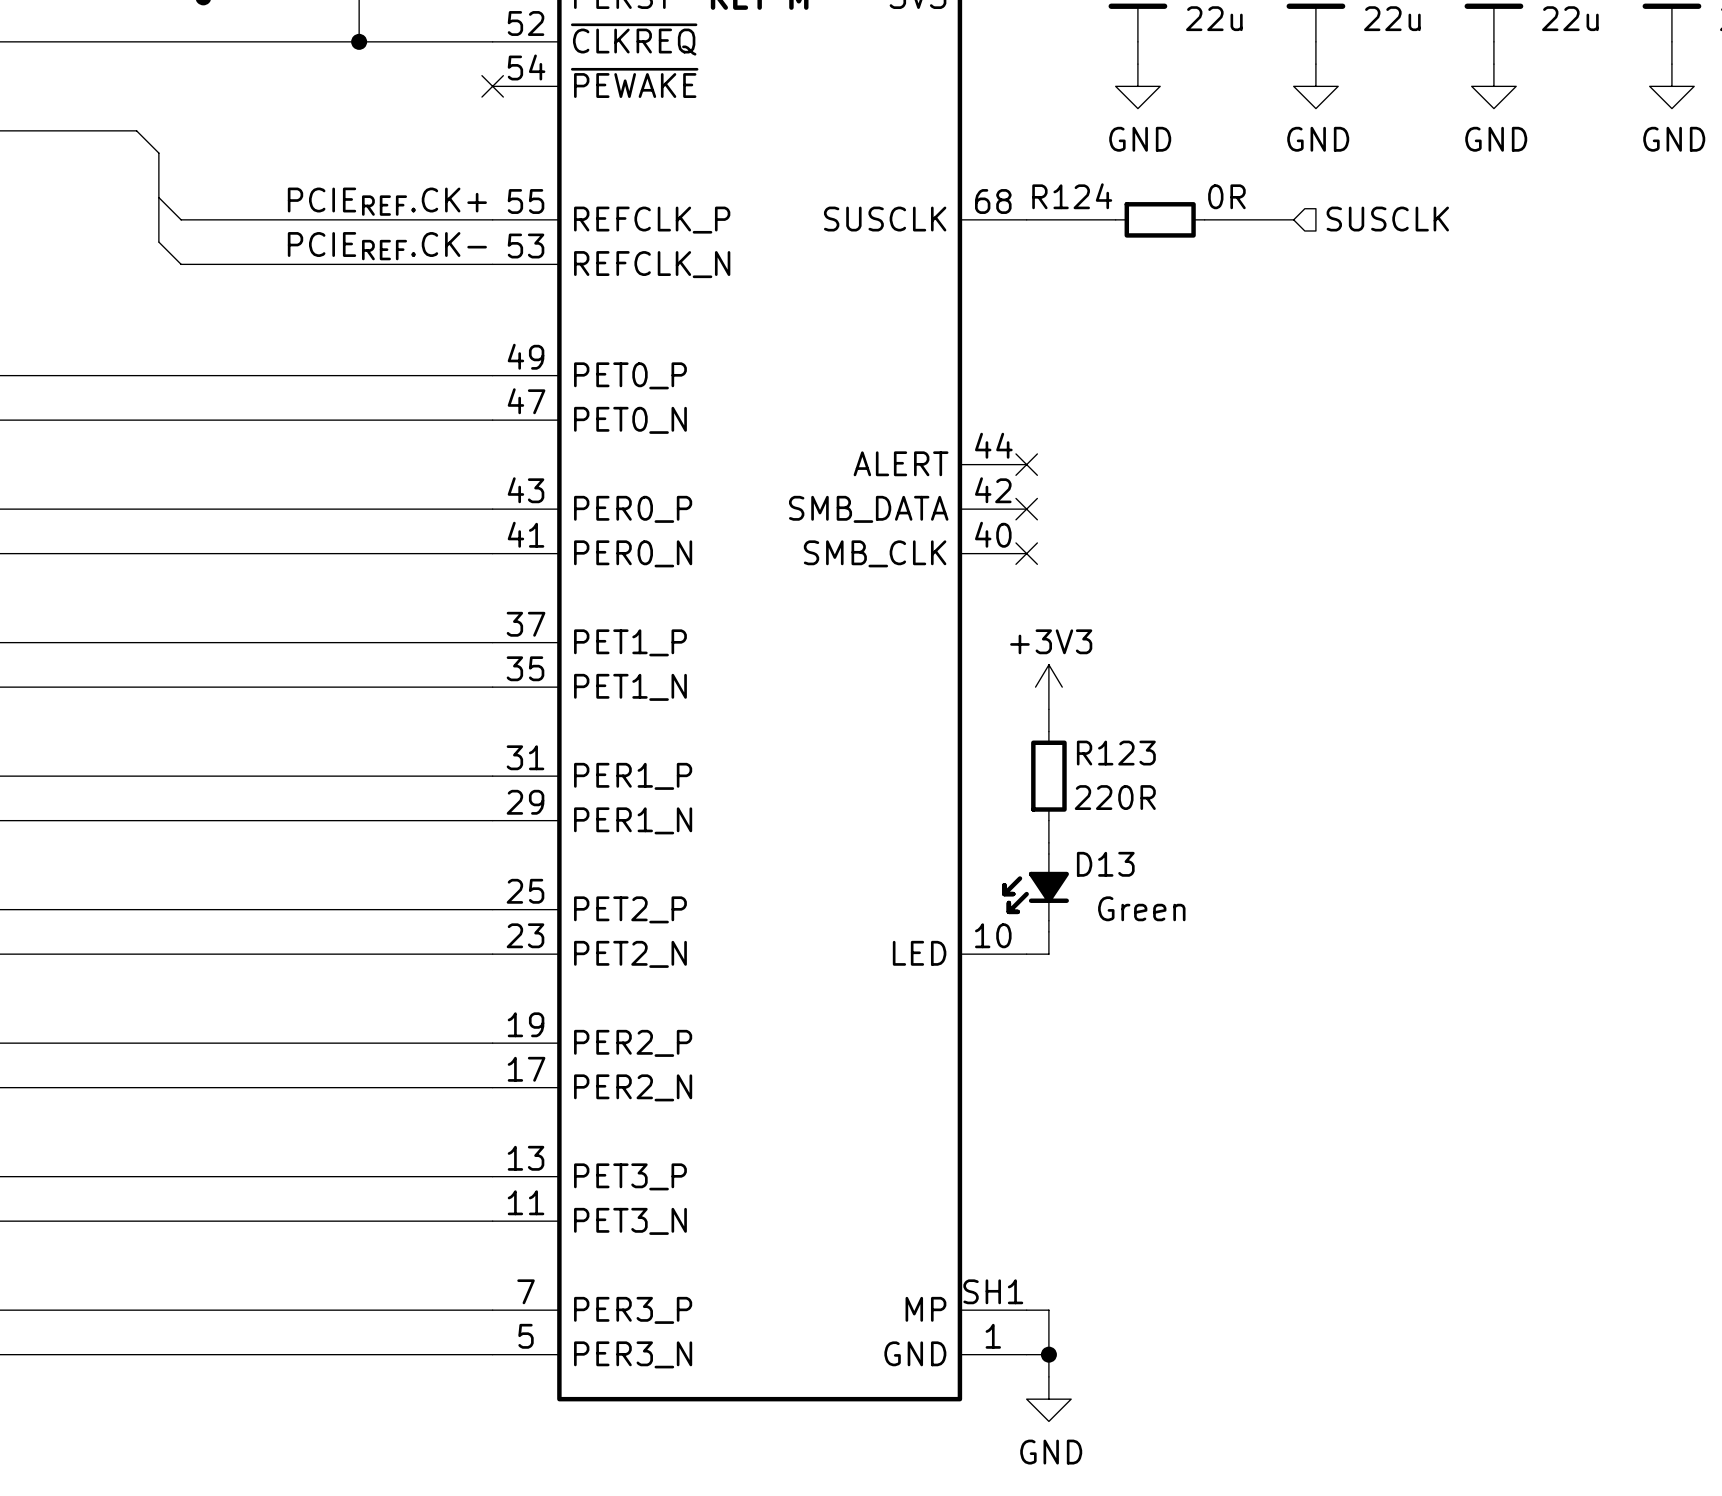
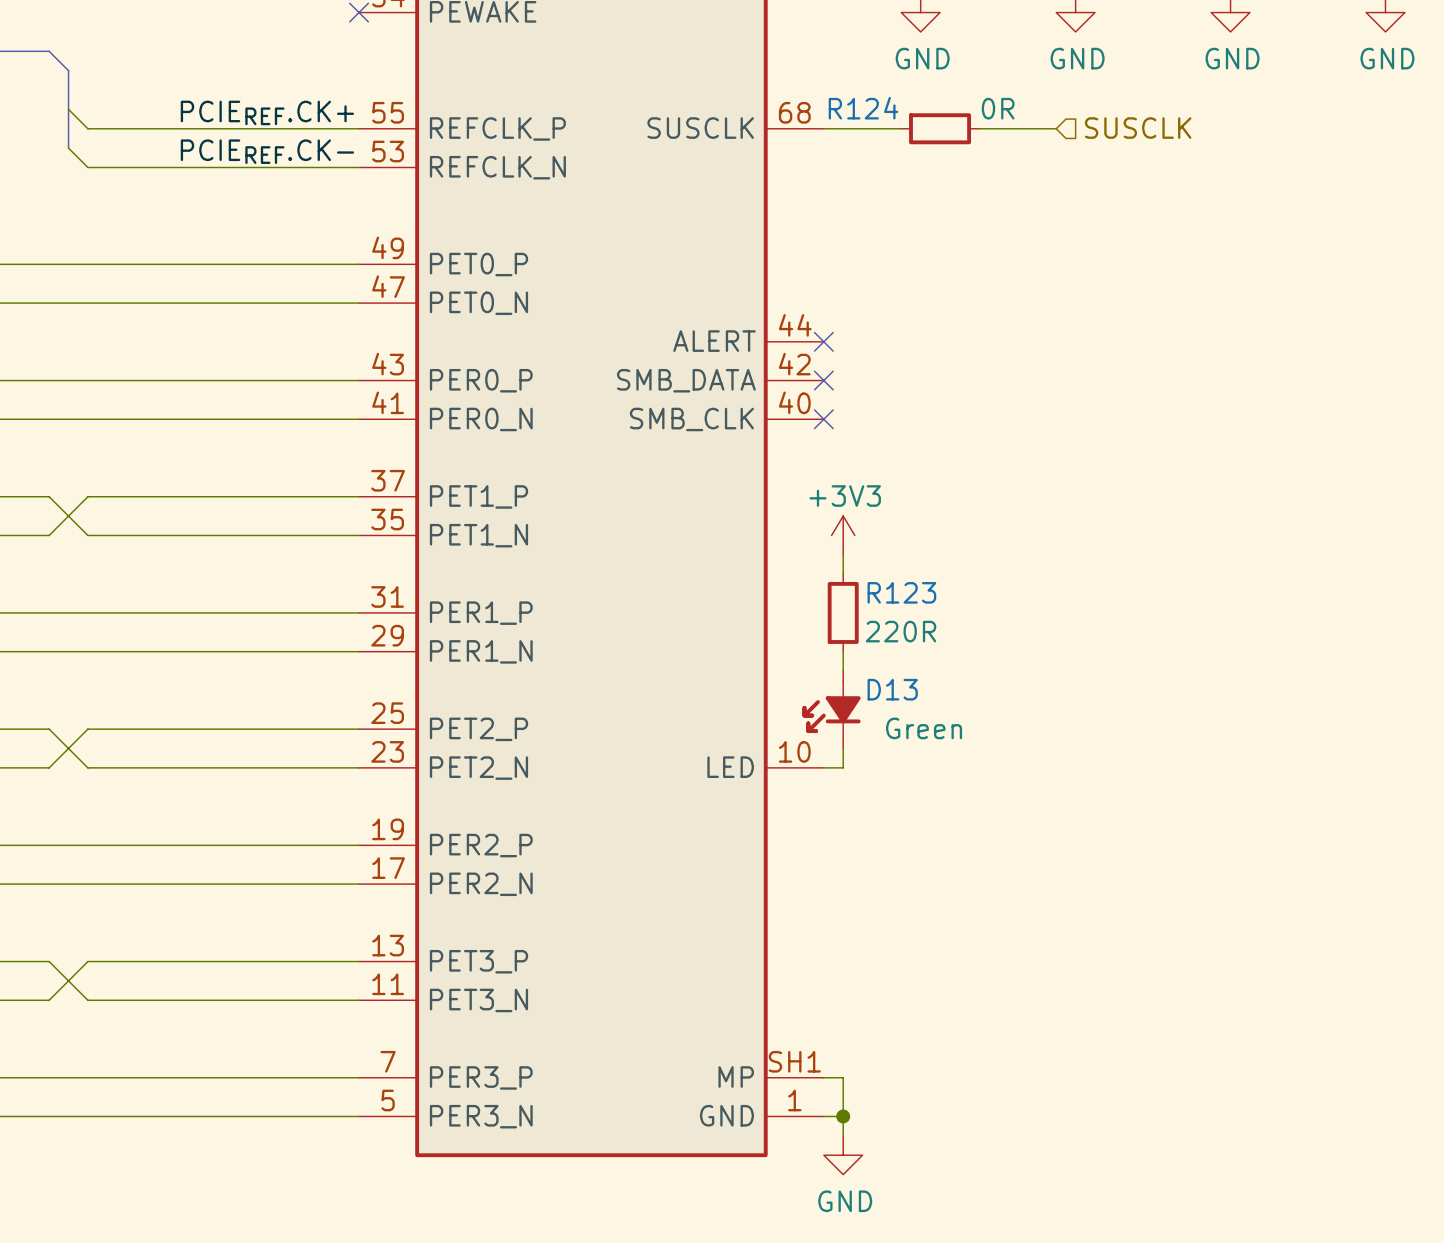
wire: (136, 642) (181, 642) -> (49, 496) (87, 535)
wire: (136, 687) (181, 687) -> (49, 535) (87, 496)
wire: (136, 909) (181, 909) -> (49, 729) (87, 767)
wire: (136, 954) (181, 954) -> (49, 767) (87, 729)
wire: (136, 1176) (181, 1176) -> (49, 961) (87, 1000)
wire: (136, 1221) (181, 1221) -> (49, 1000) (87, 961)

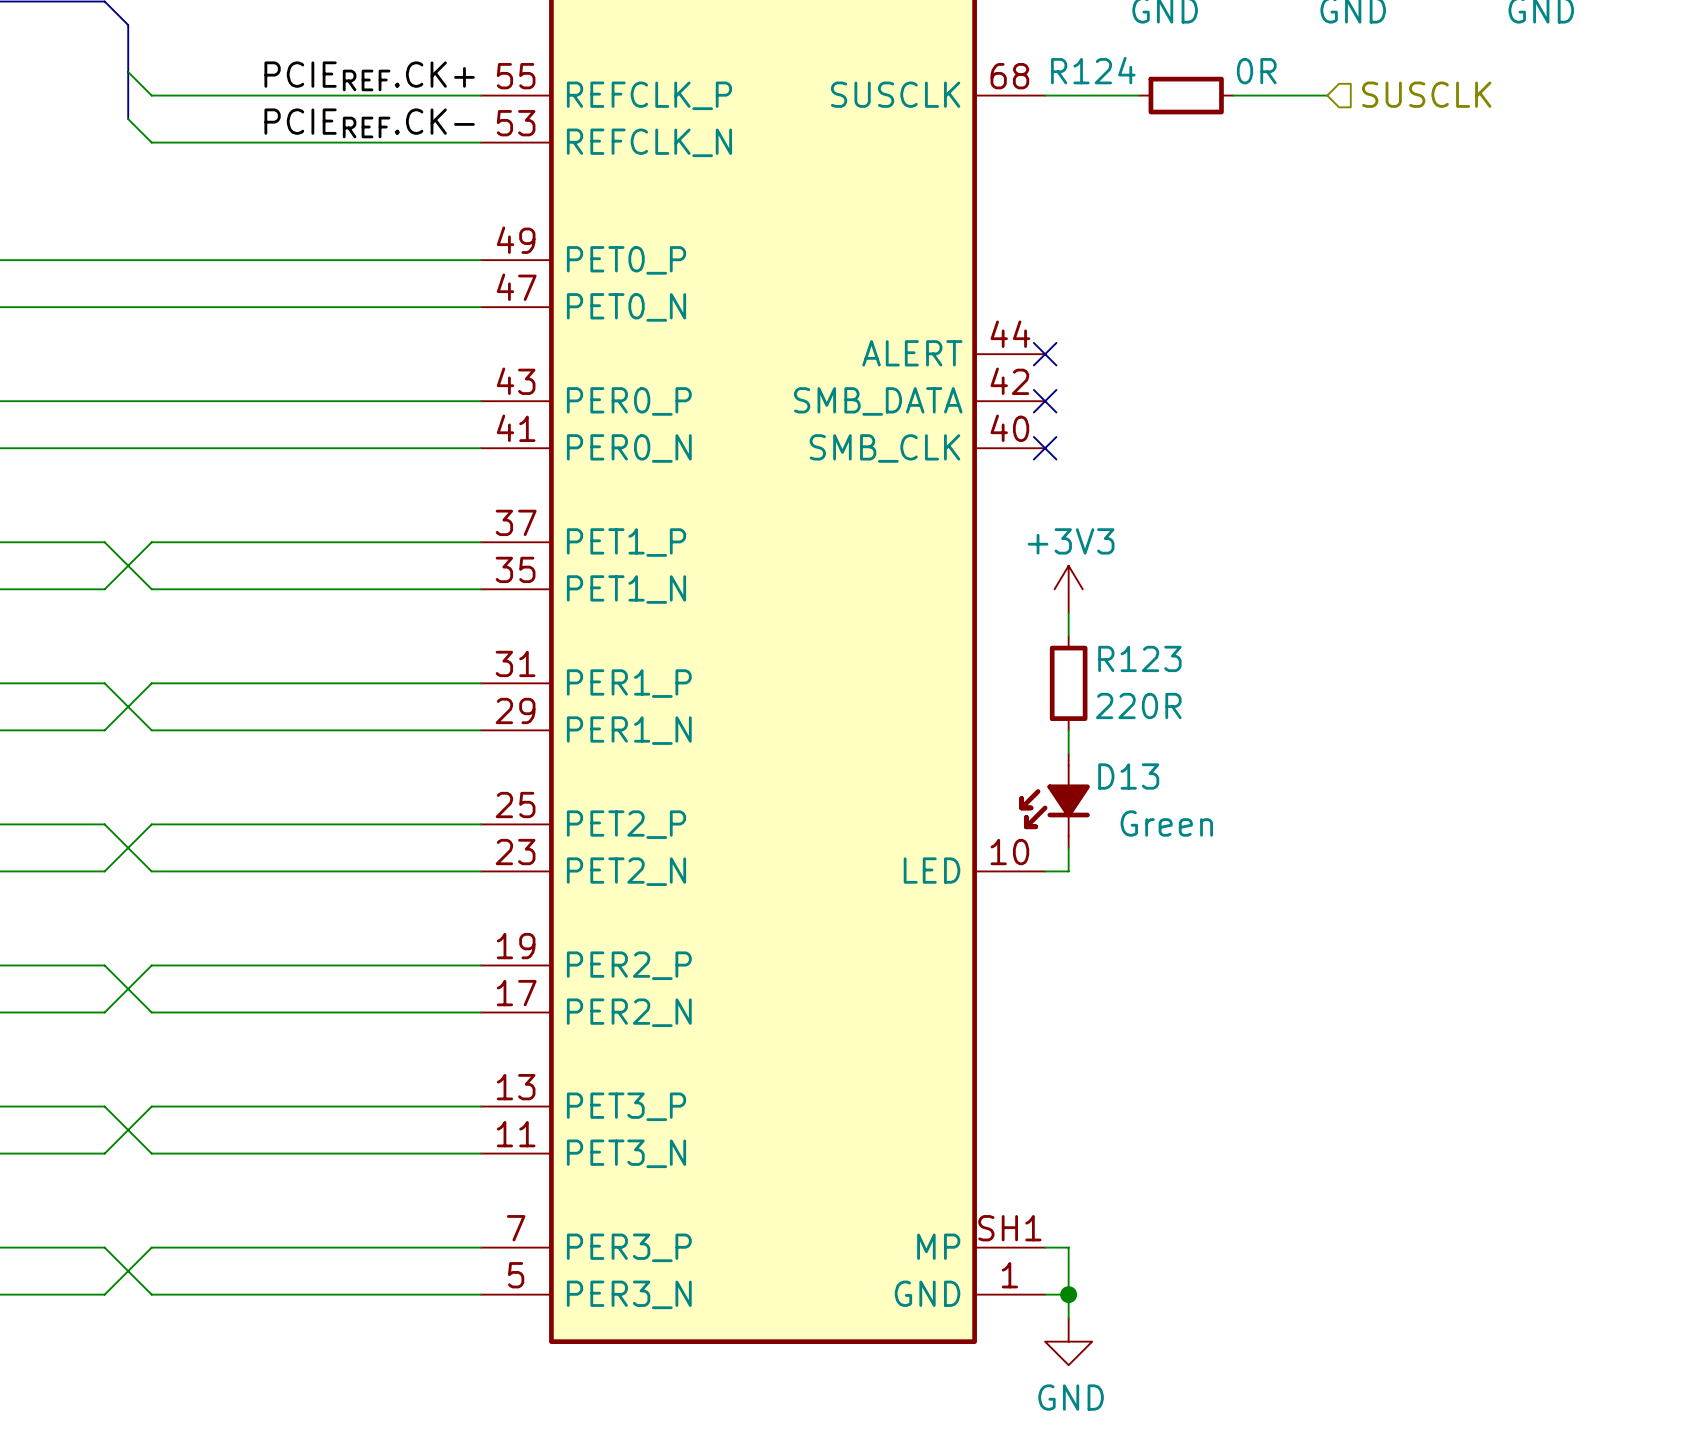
wire: (49, 612) (87, 612) -> (104, 683) (151, 730)
wire: (49, 651) (87, 651) -> (104, 730) (151, 683)
wire: (49, 845) (87, 845) -> (104, 965) (151, 1012)
wire: (49, 884) (87, 884) -> (104, 1012) (151, 965)
wire: (49, 1077) (87, 1077) -> (104, 1247) (151, 1294)
wire: (49, 1116) (87, 1116) -> (104, 1294) (151, 1247)

